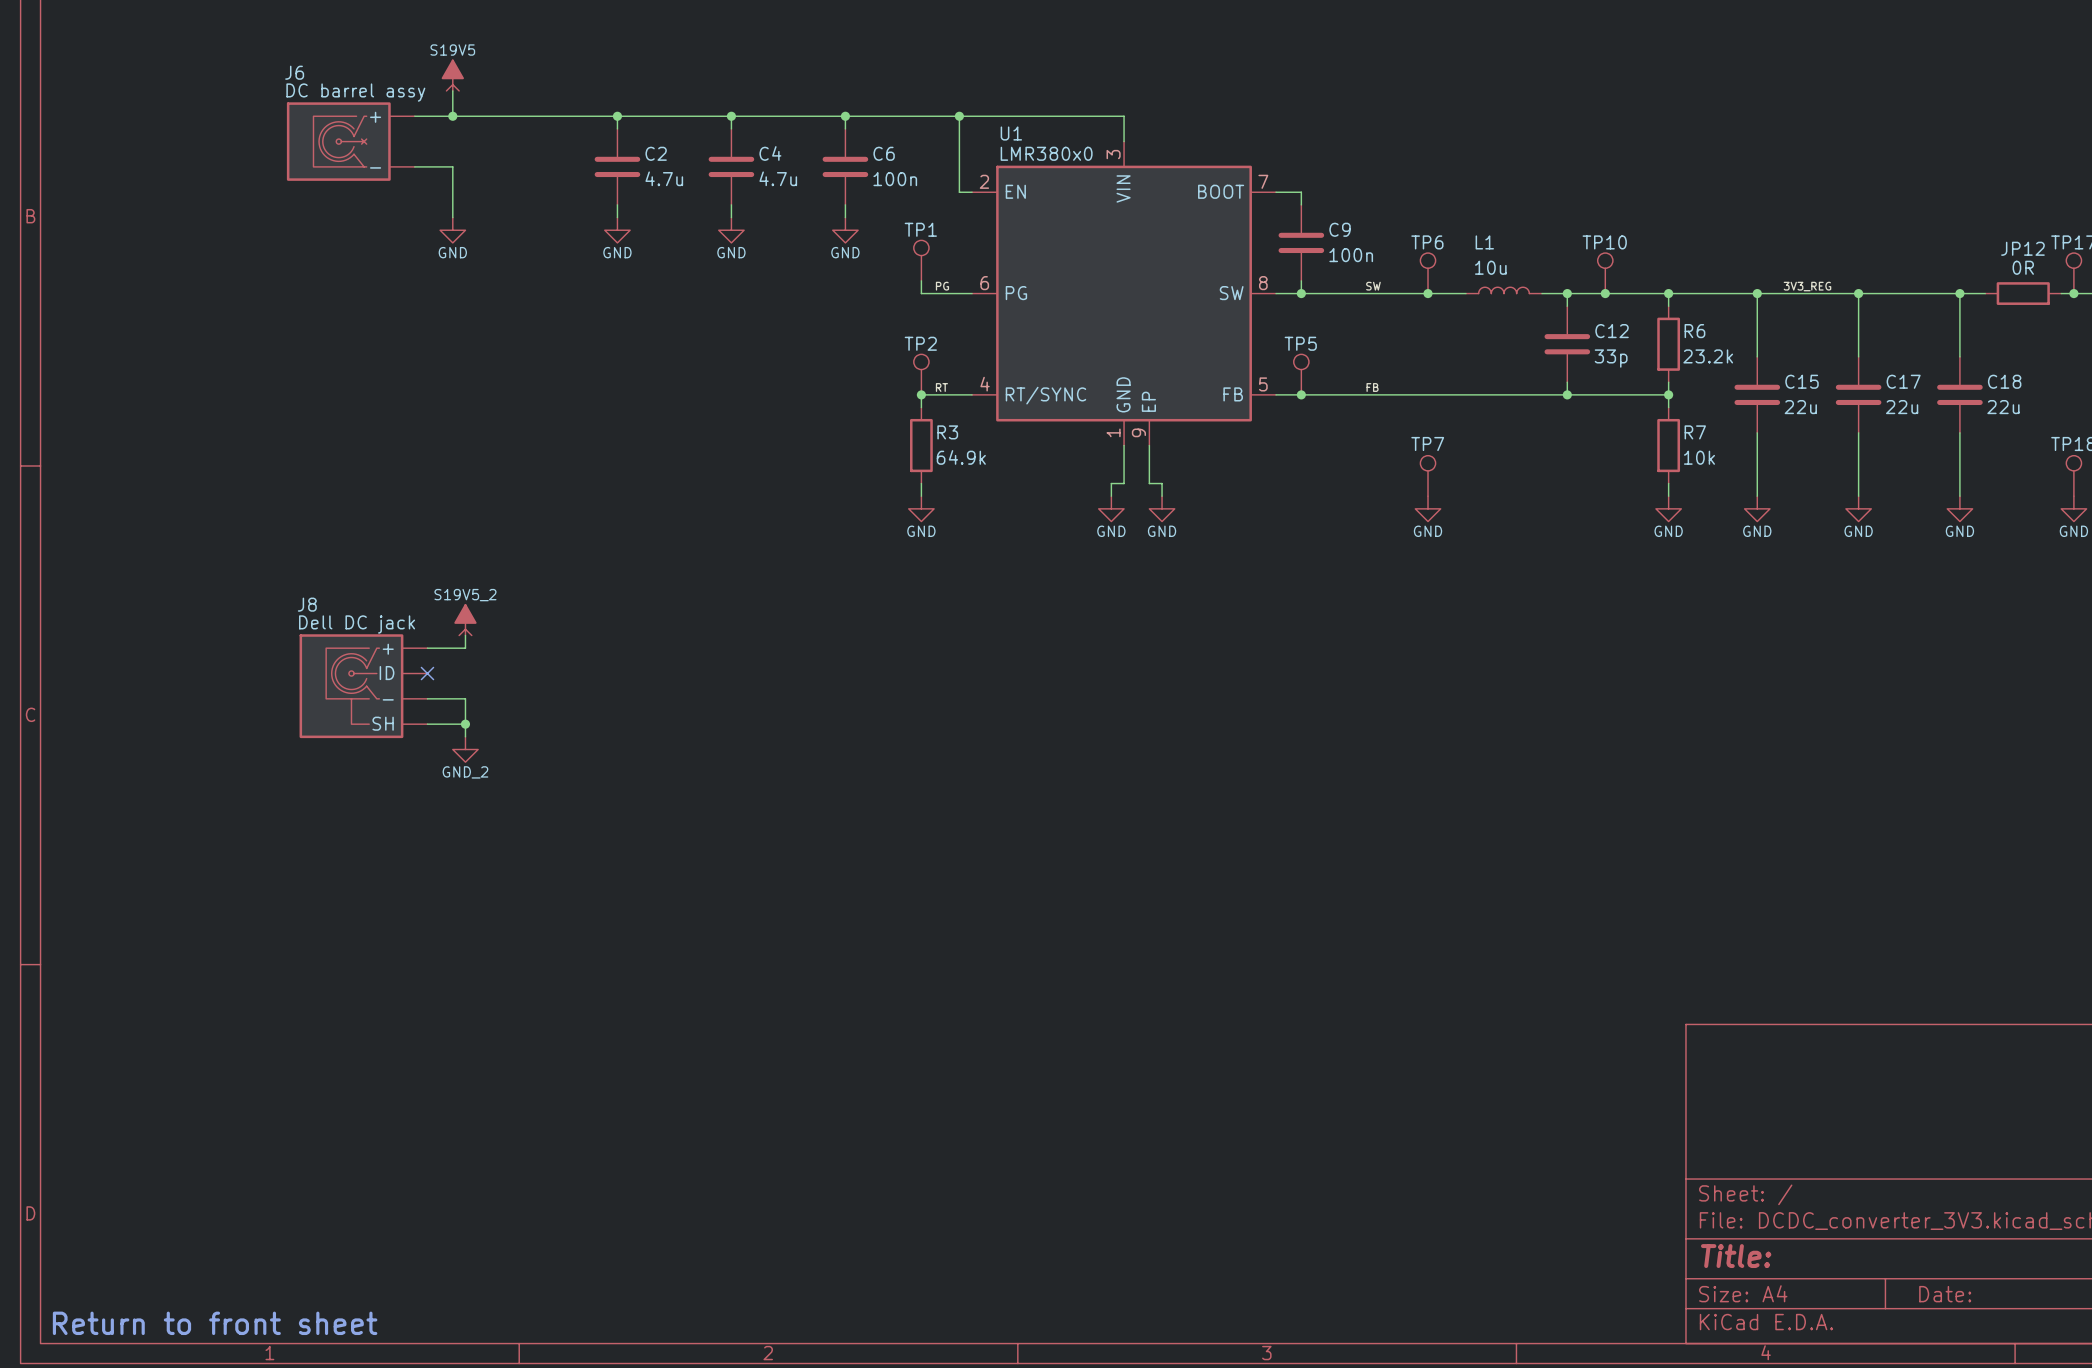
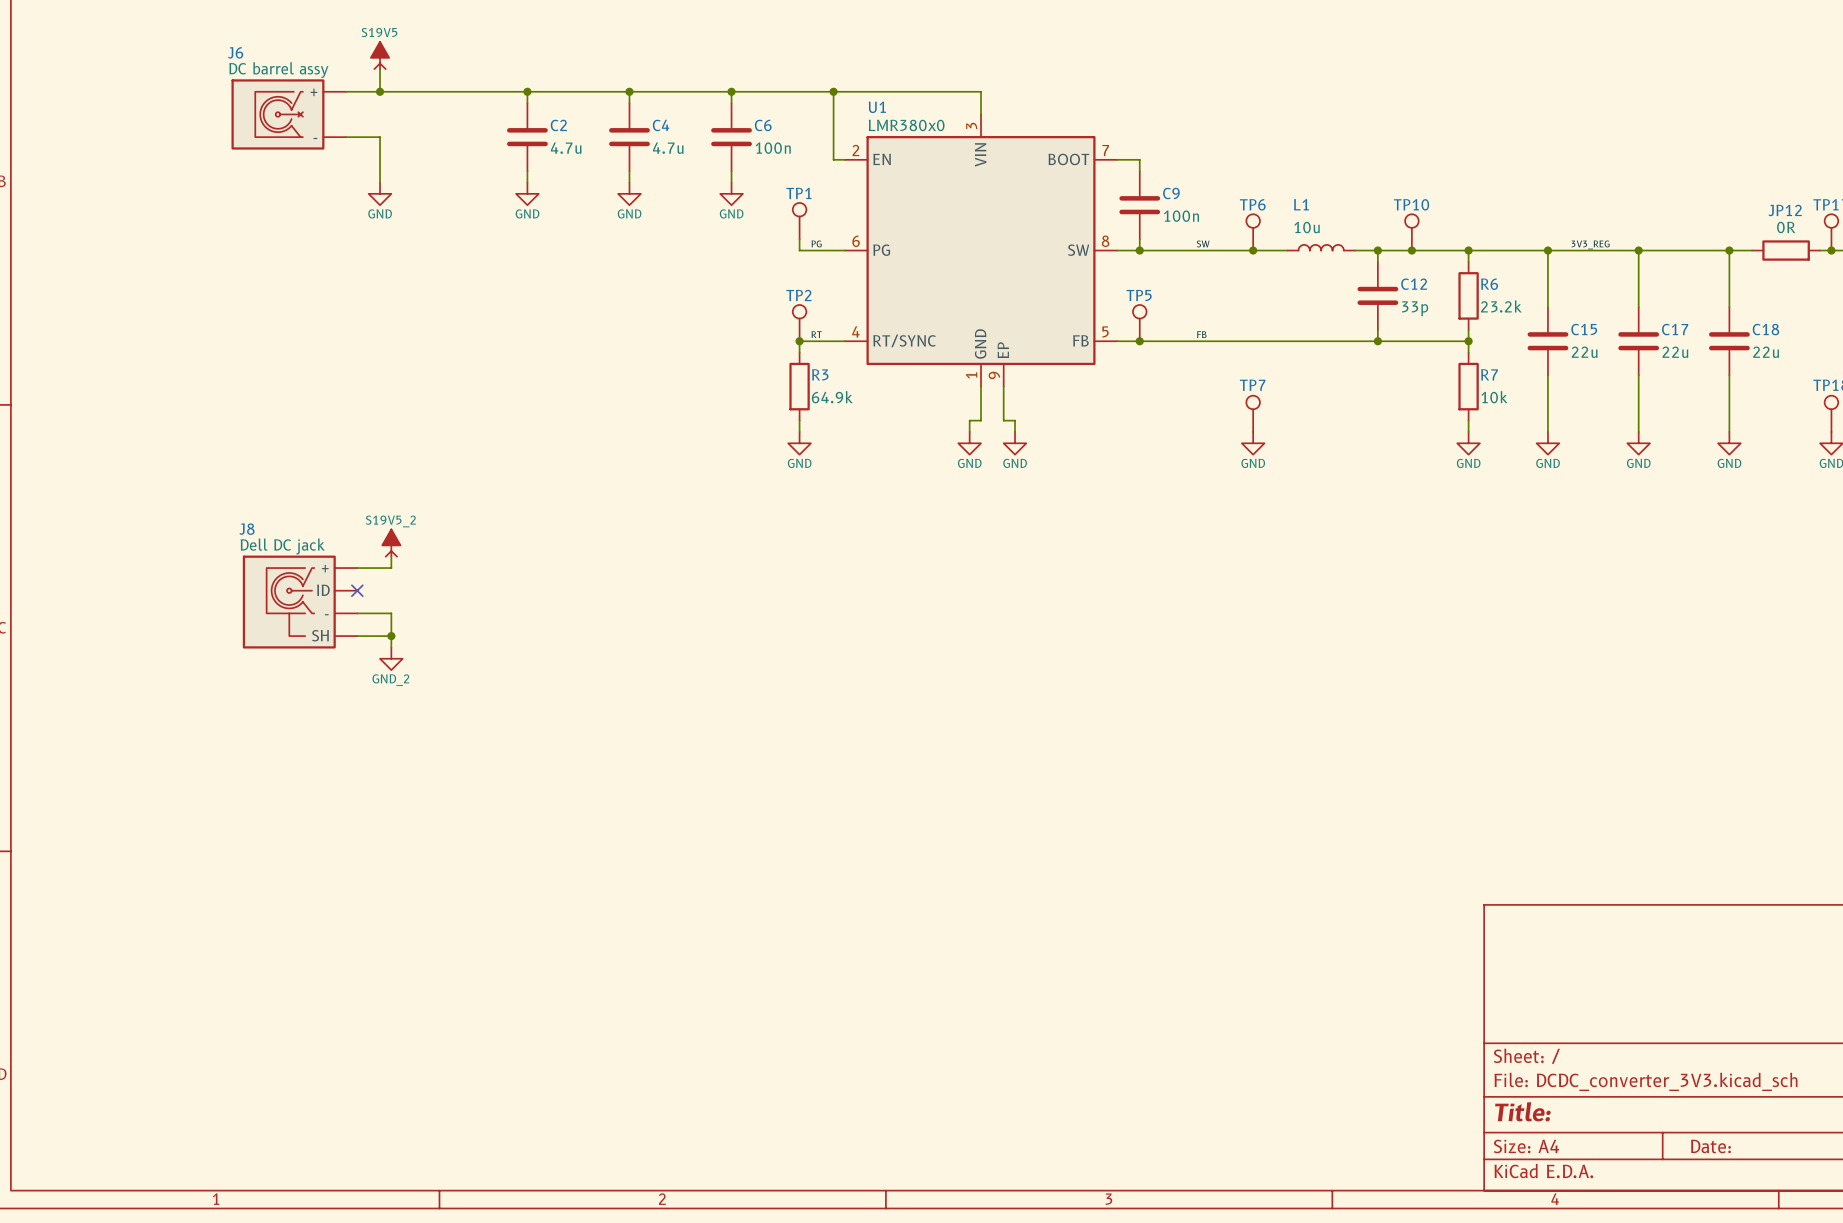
text: Return to front sheet (215, 1323) -> none

